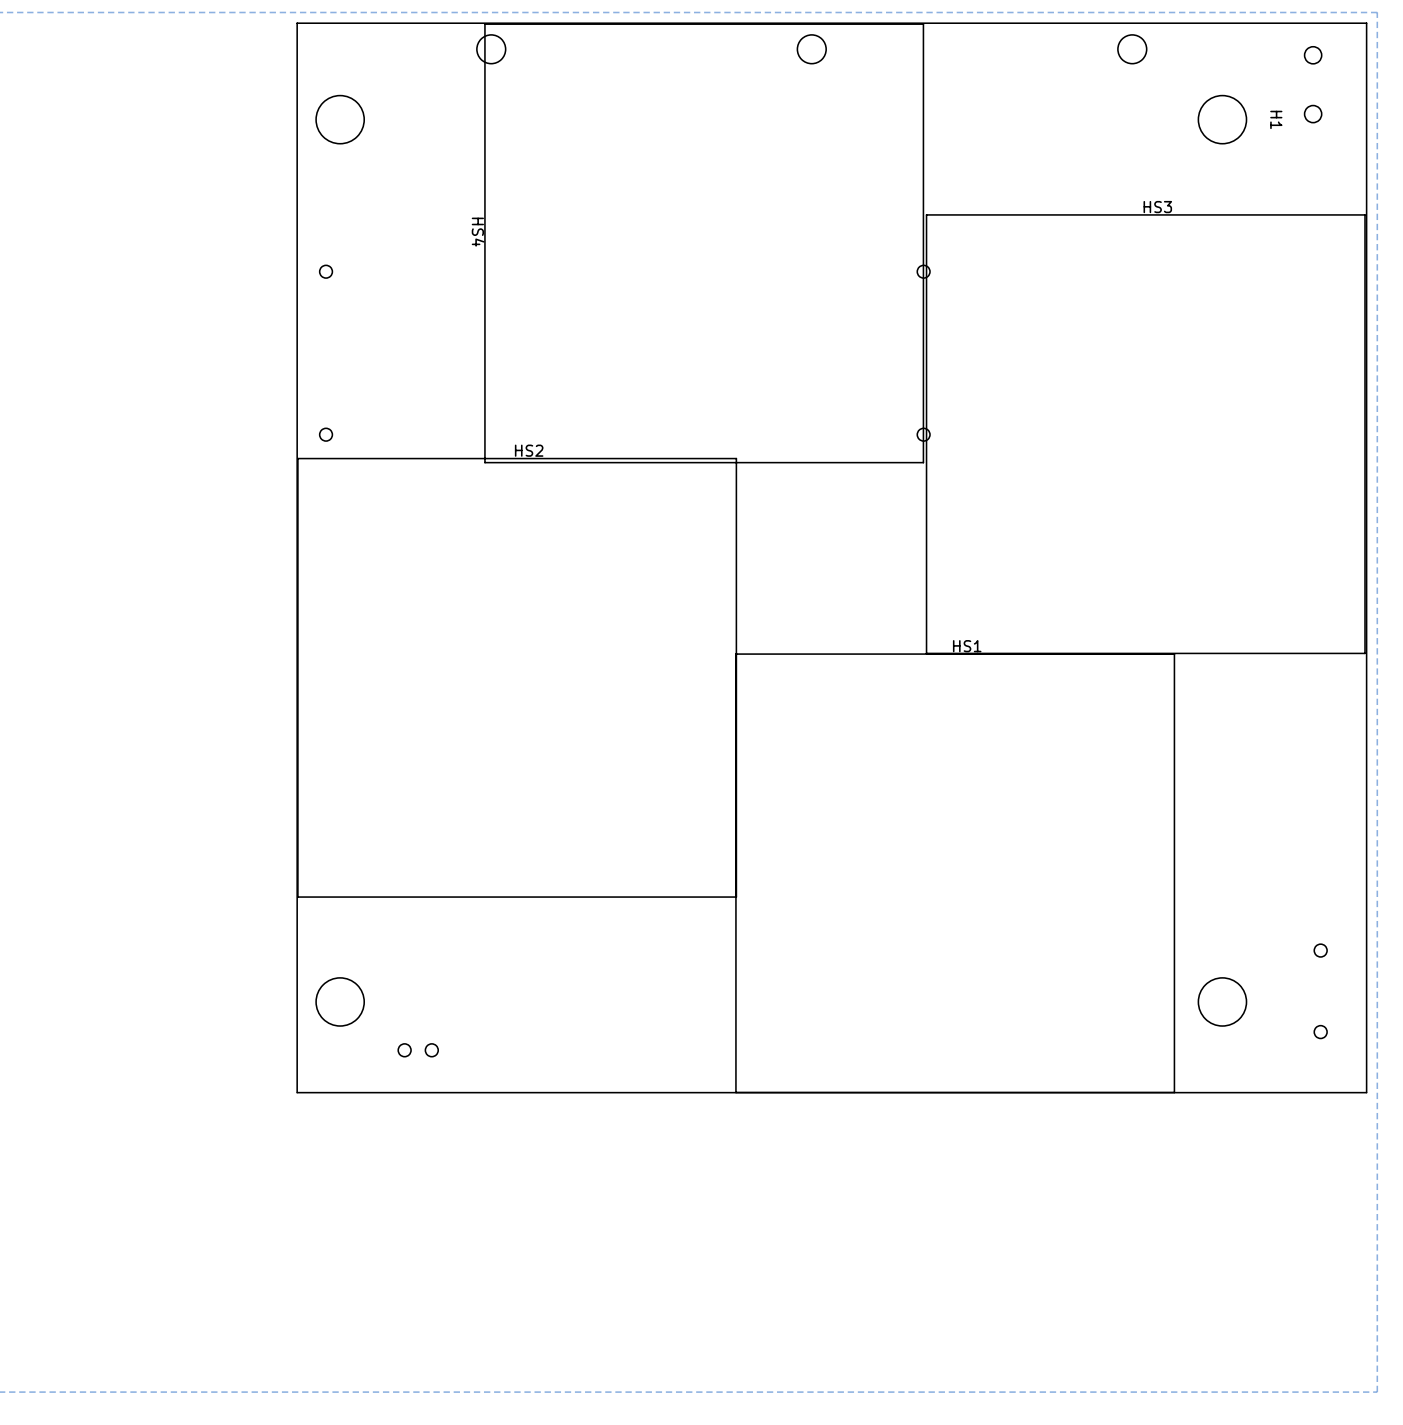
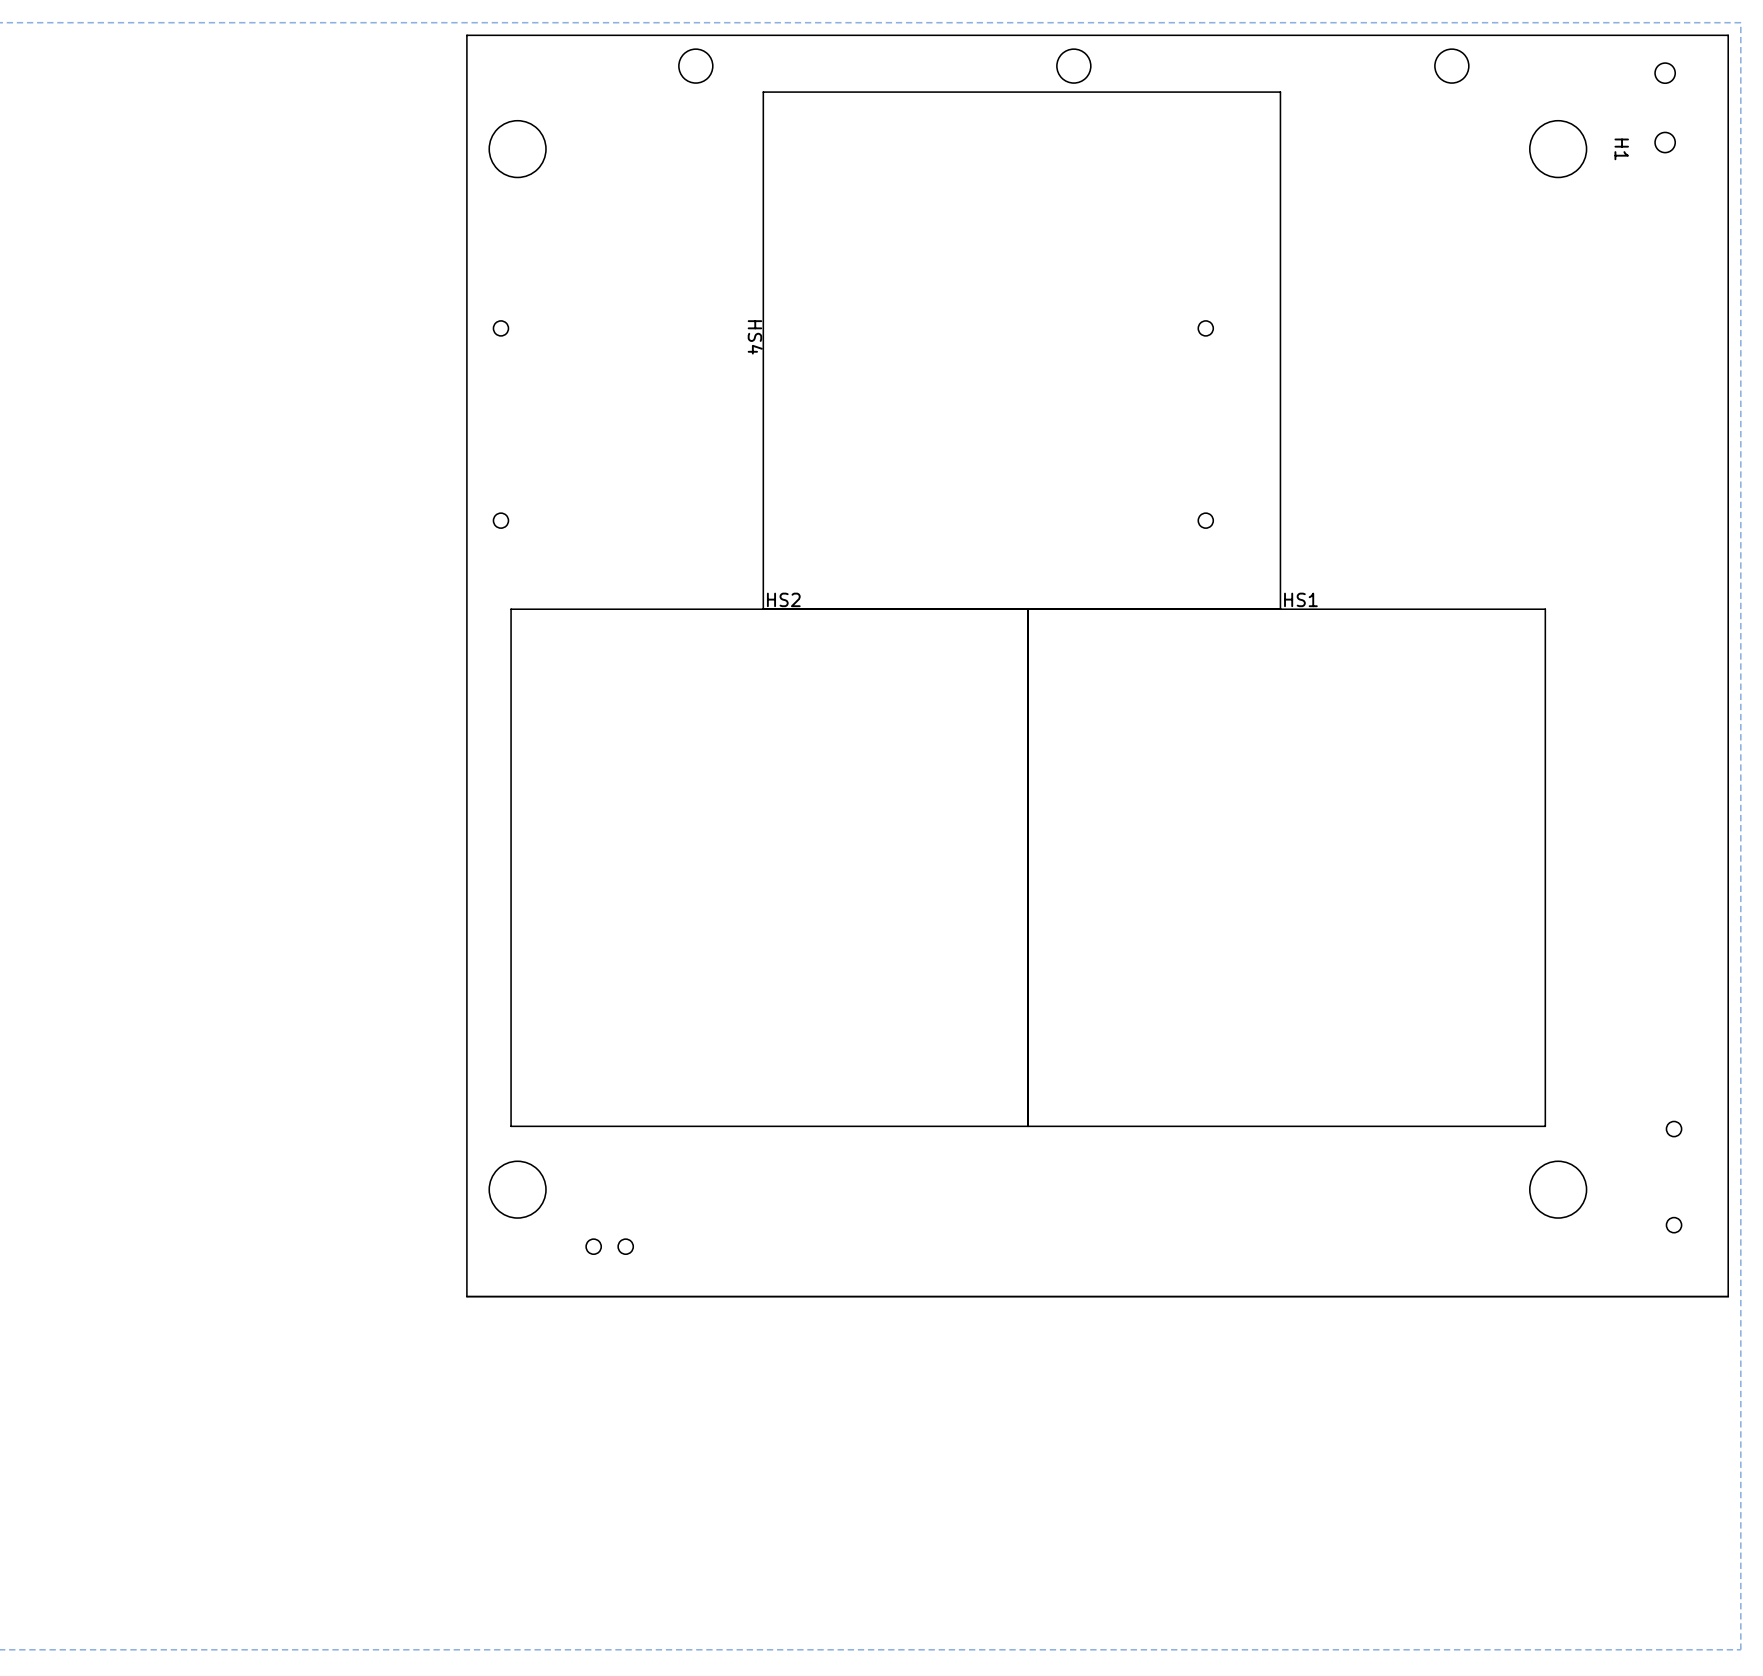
HS4 position: (704, 243) -> (1021, 350)
HS3: (1145, 434) -> none
HS2 position: (517, 677) -> (769, 867)
HS1 position: (955, 873) -> (1286, 867)

